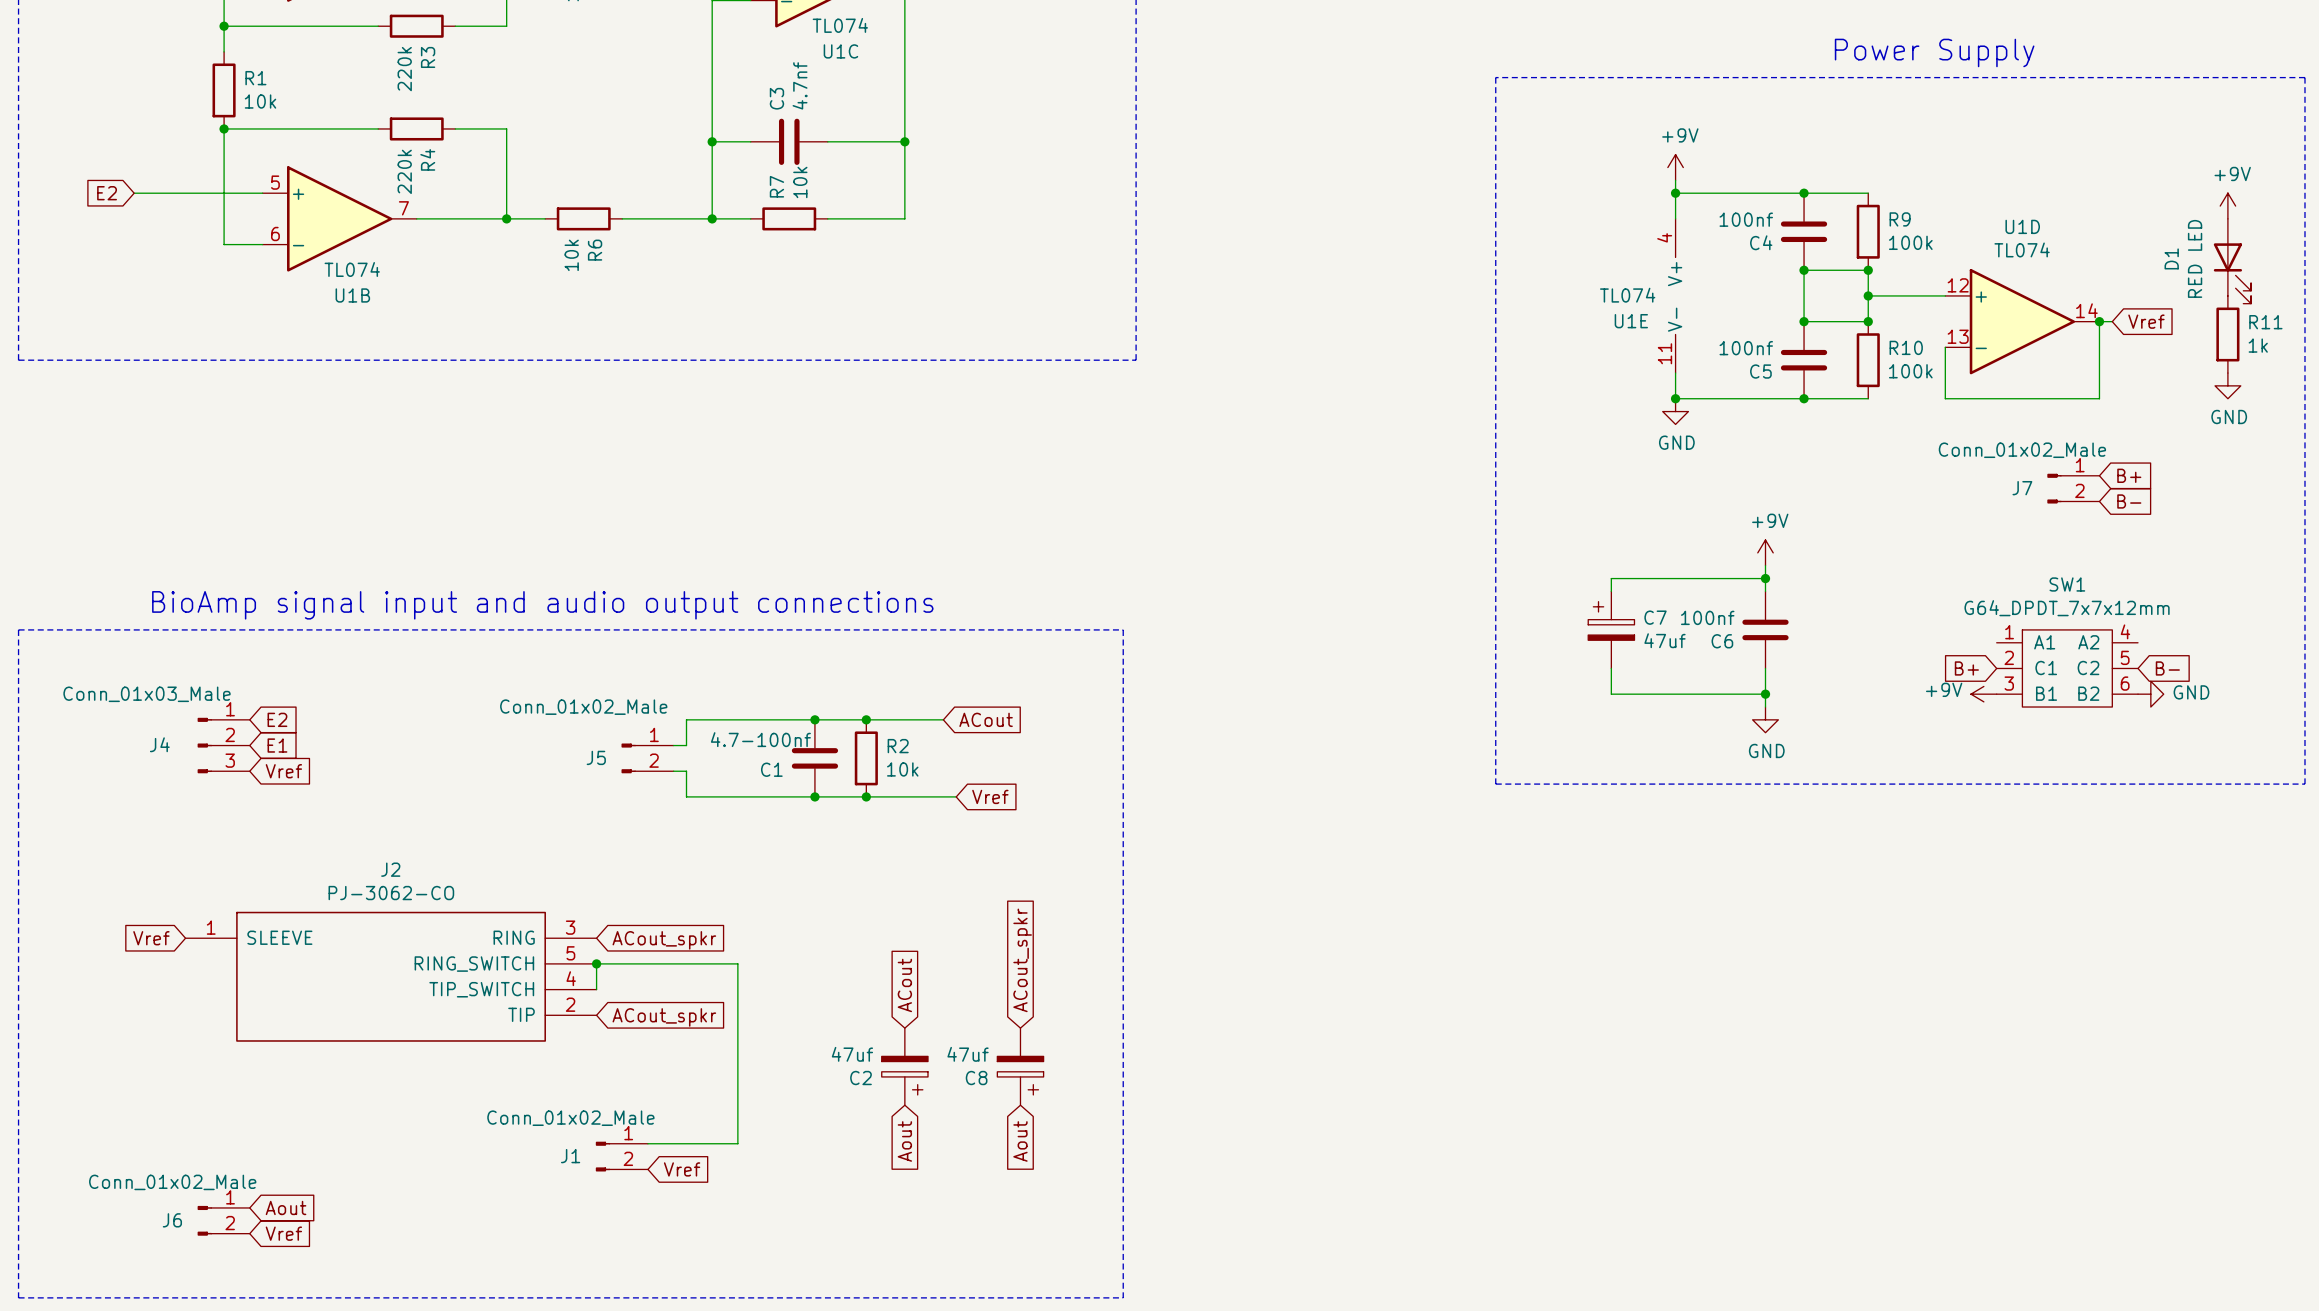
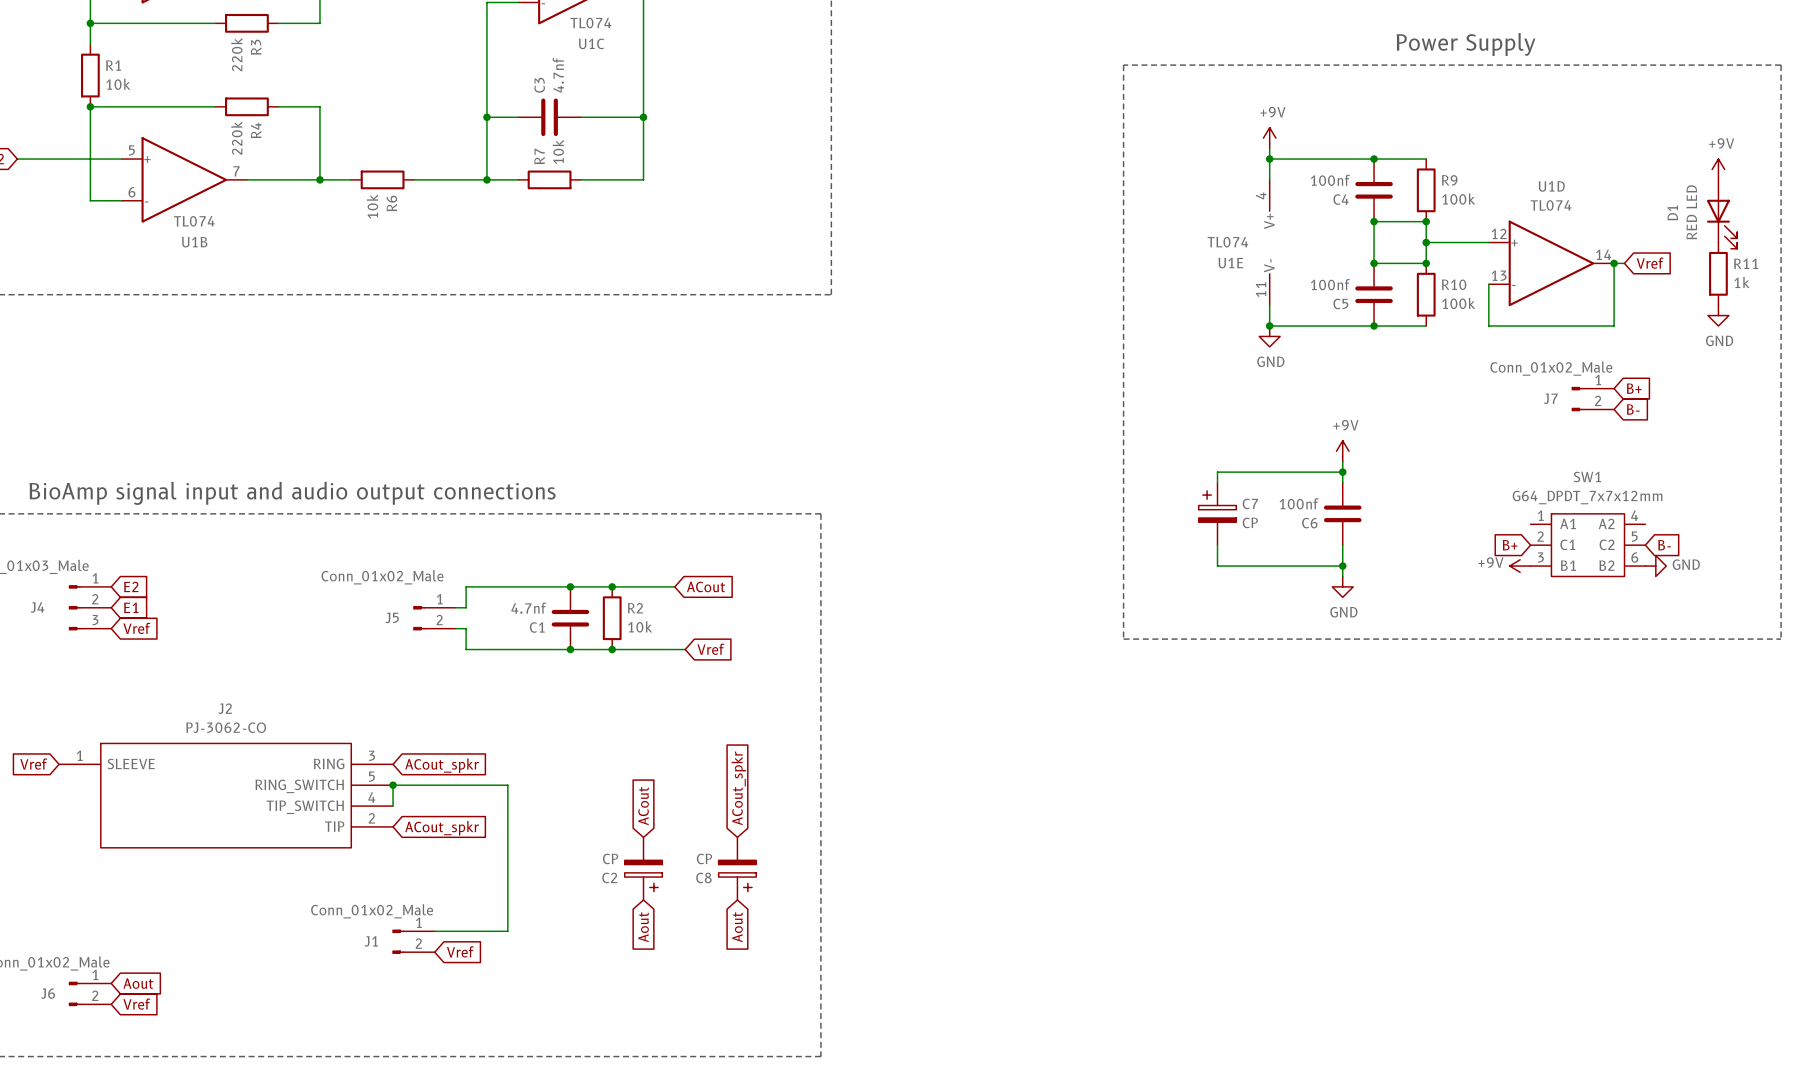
C7 value: 47uf (1665, 640) -> CP (1250, 522)
C1 value: 4.7-100nf (760, 739) -> 4.7nf (528, 608)
C2 value: 47uf (852, 1054) -> CP (610, 858)
C8 value: 47uf (968, 1054) -> CP (704, 858)

